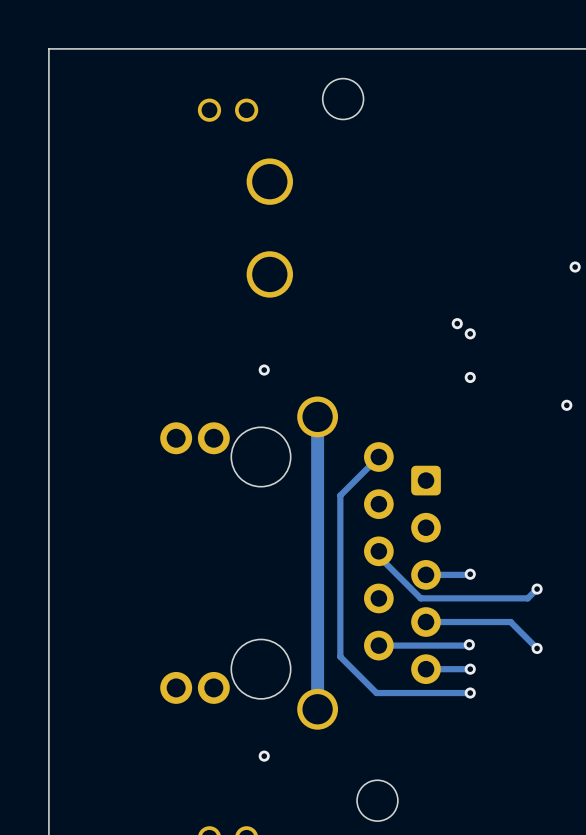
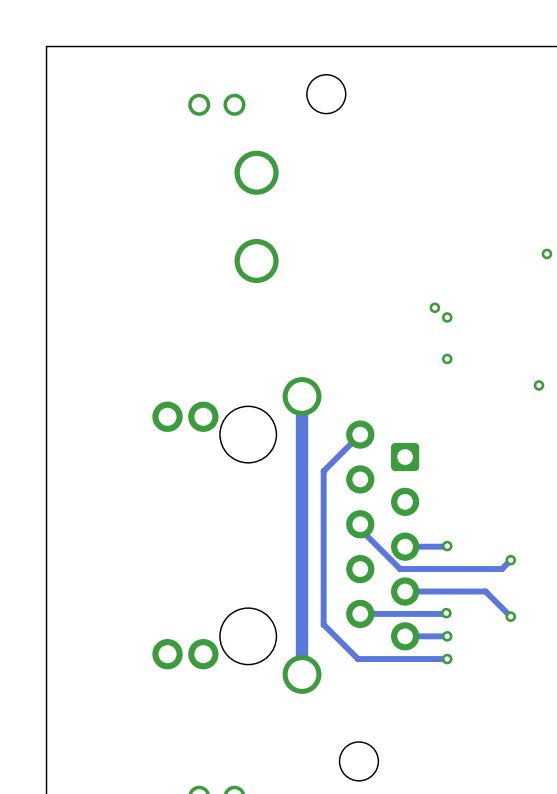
via: (264, 370) -> none
via: (264, 756) -> none

